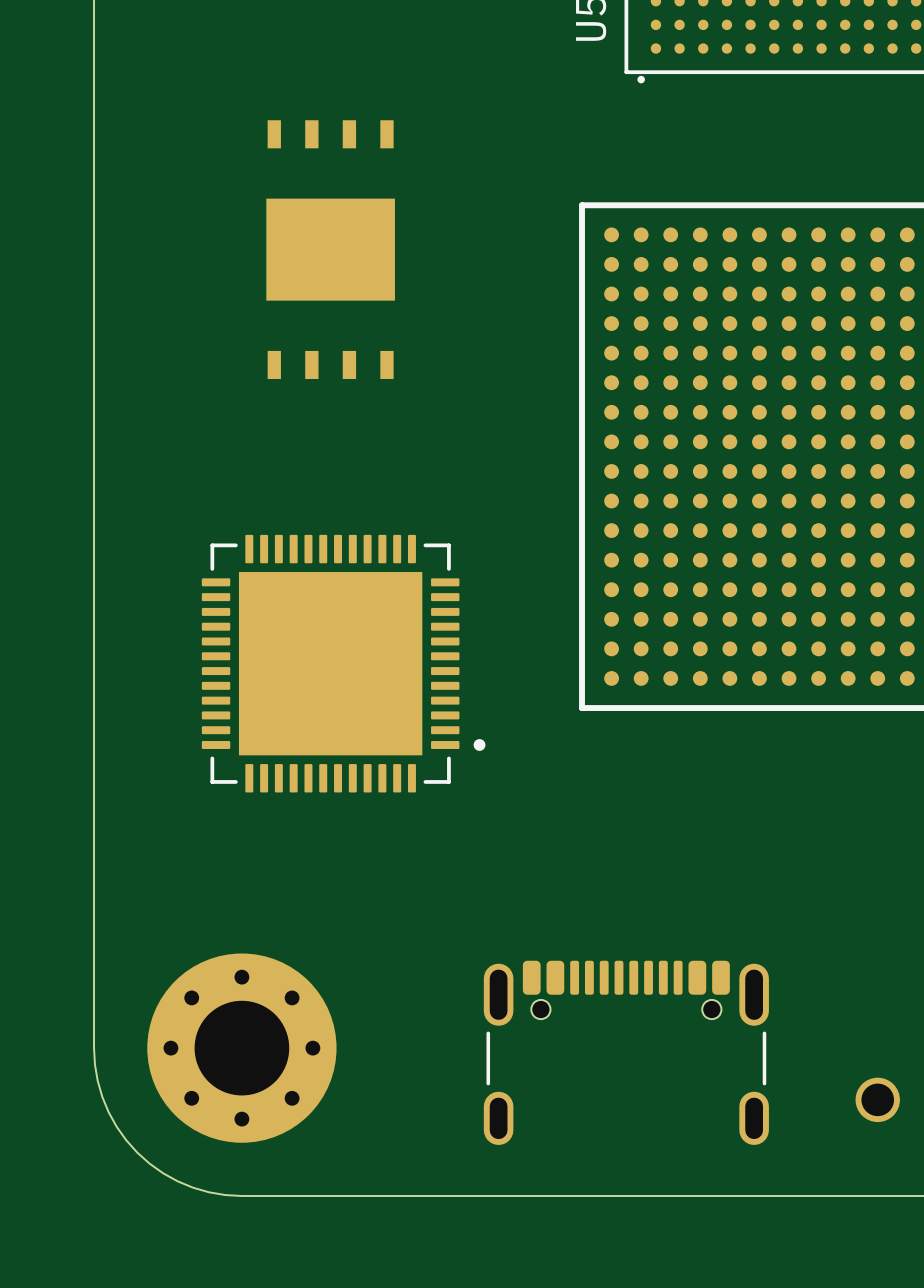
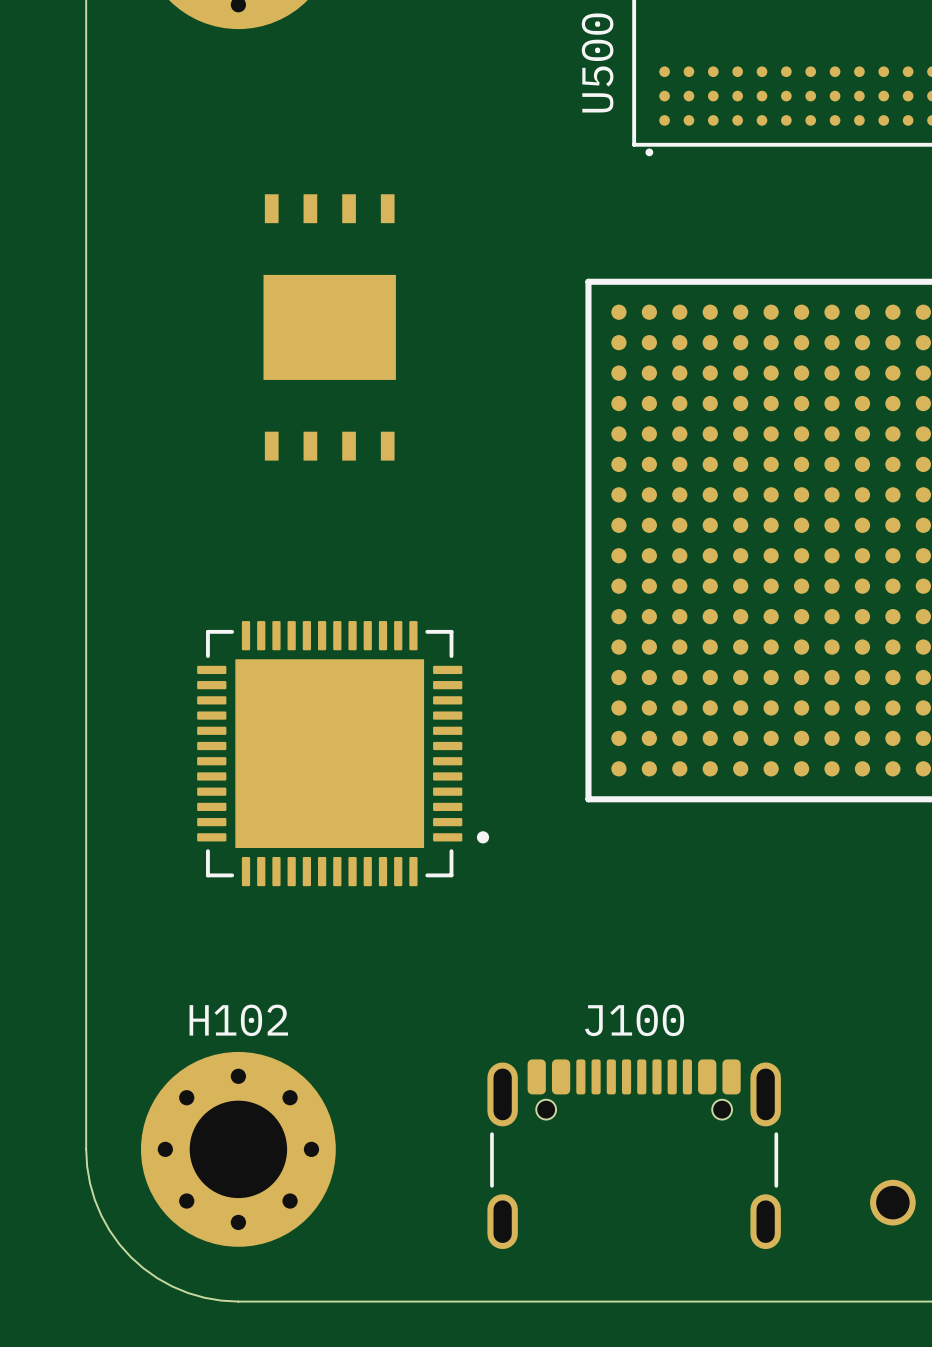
H102 name: none -> H102 (238, 1020)
J100 name: none -> J100 (634, 1020)

